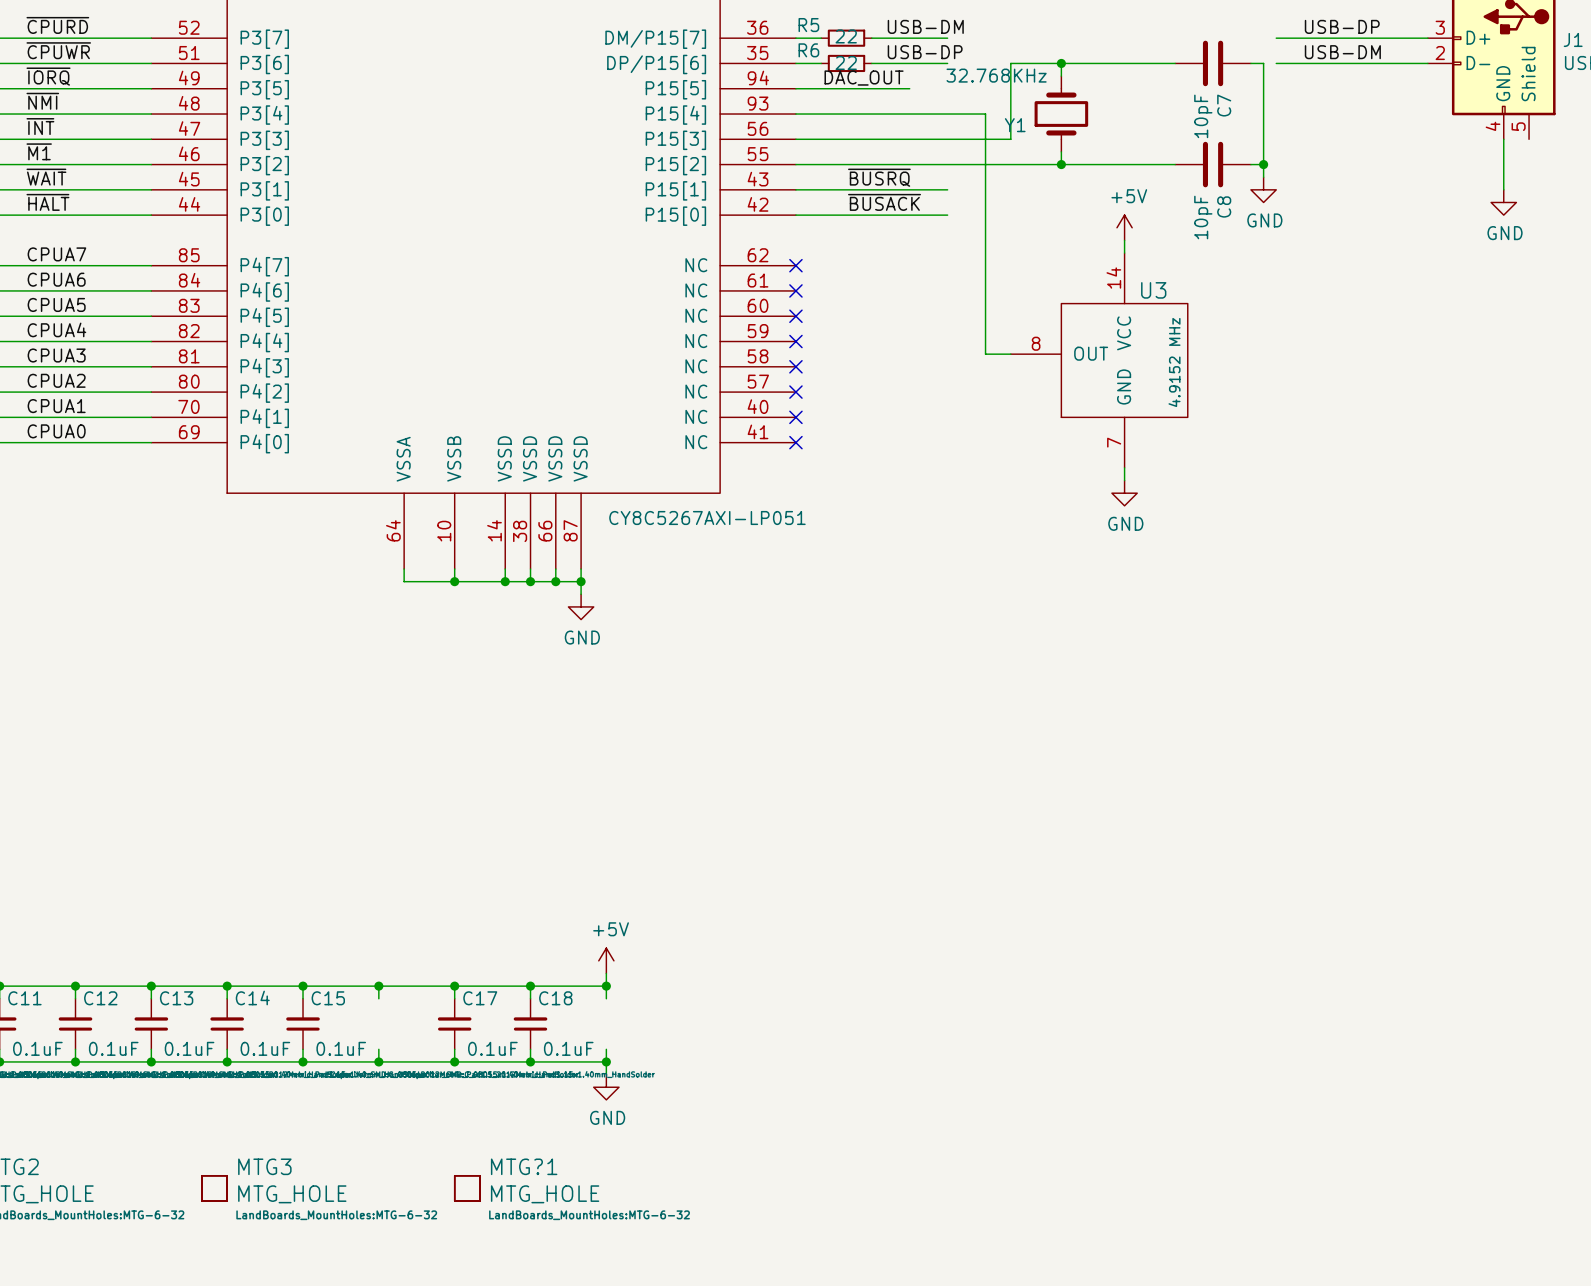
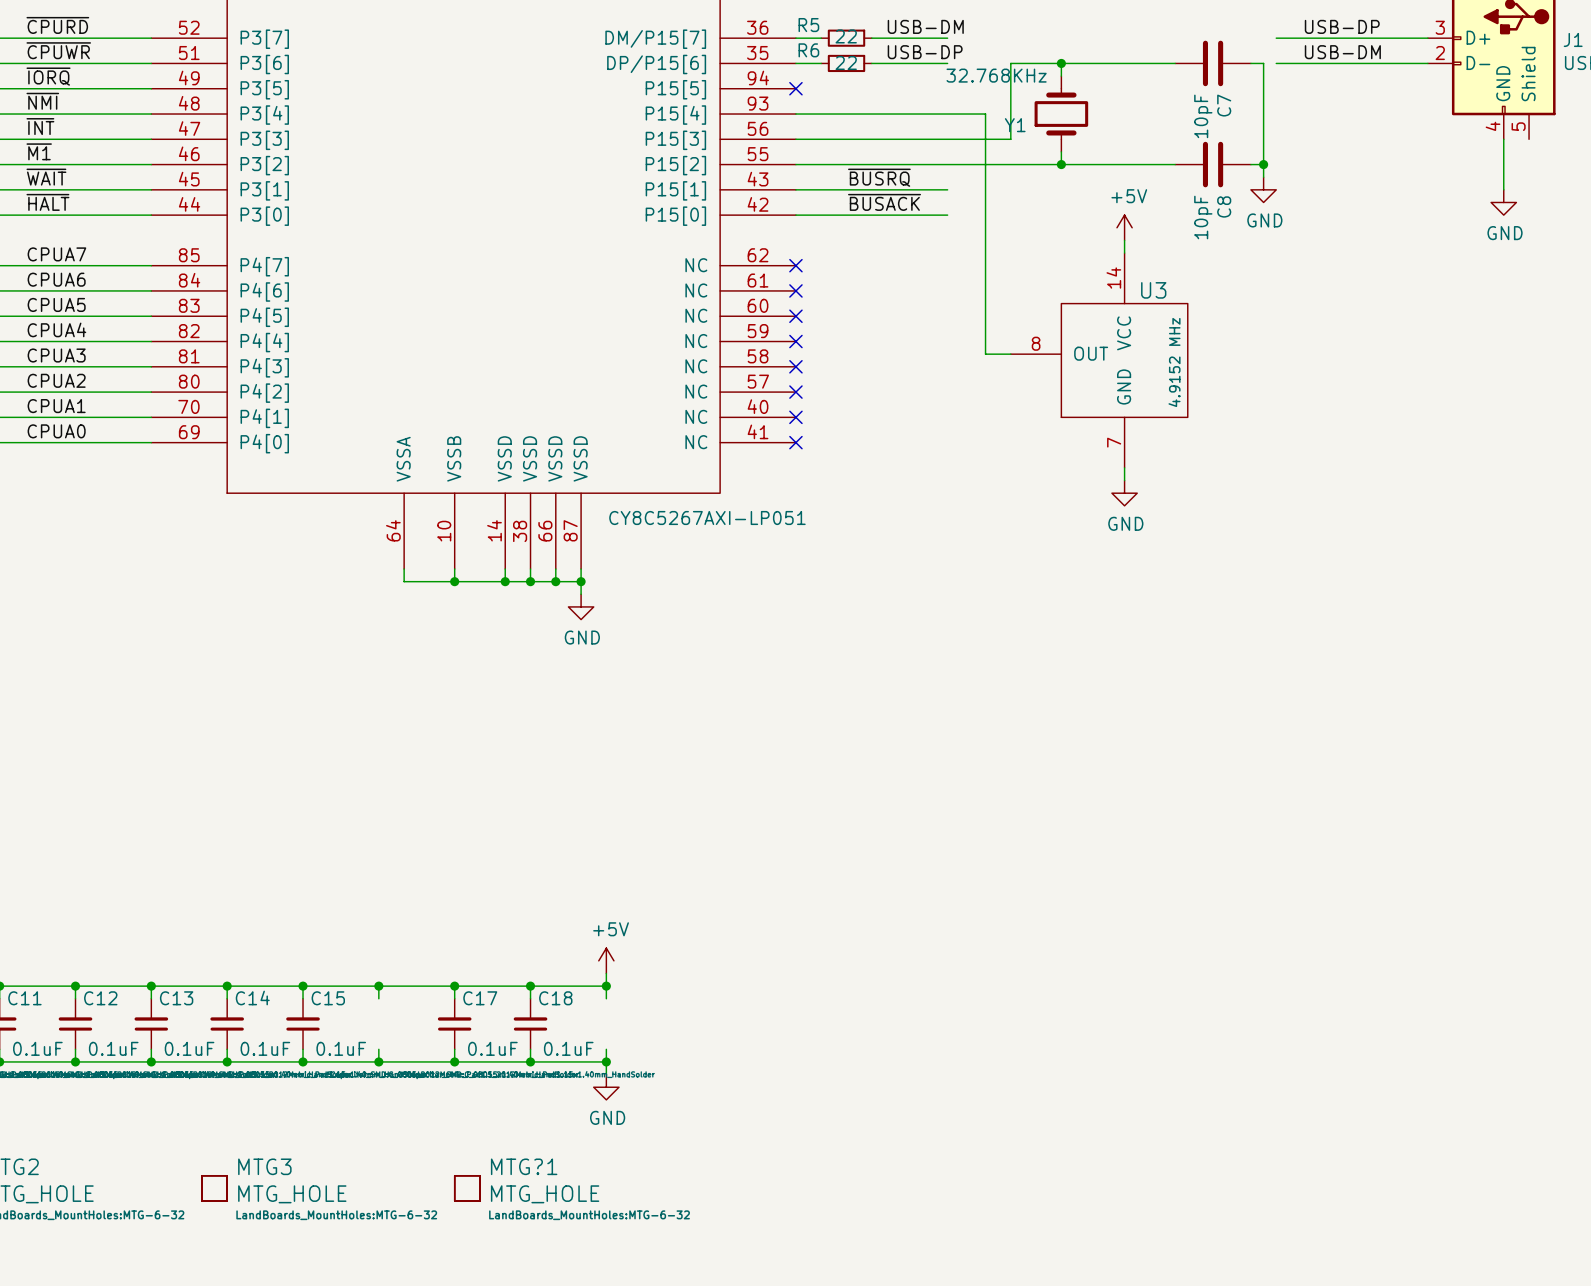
label: DAC_OUT (864, 78) -> none
wire: (795, 88) (909, 88) -> none
no-connect mark: none -> (795, 88)

